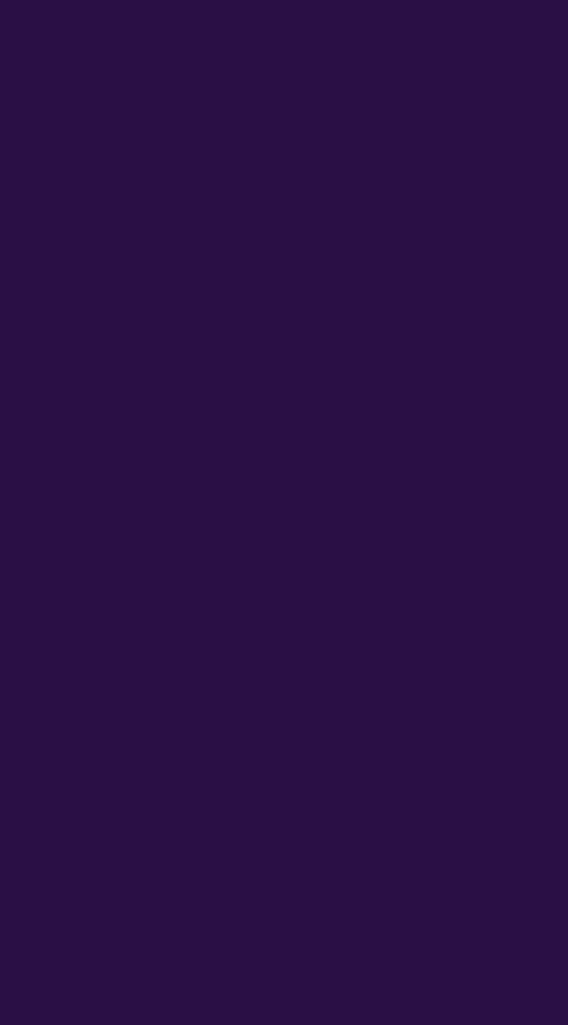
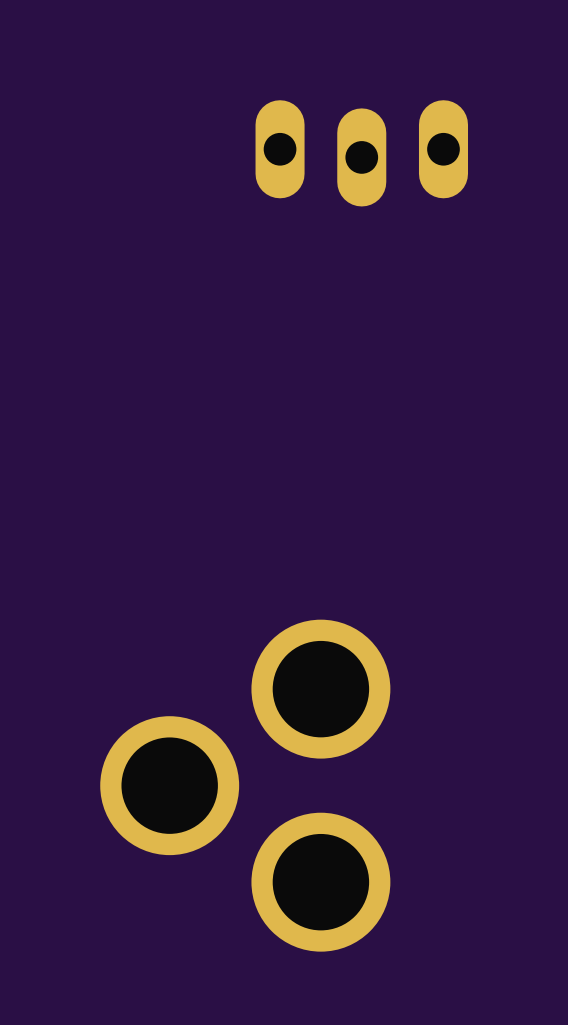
part: none -> (361, 153)
part: none -> (245, 785)

